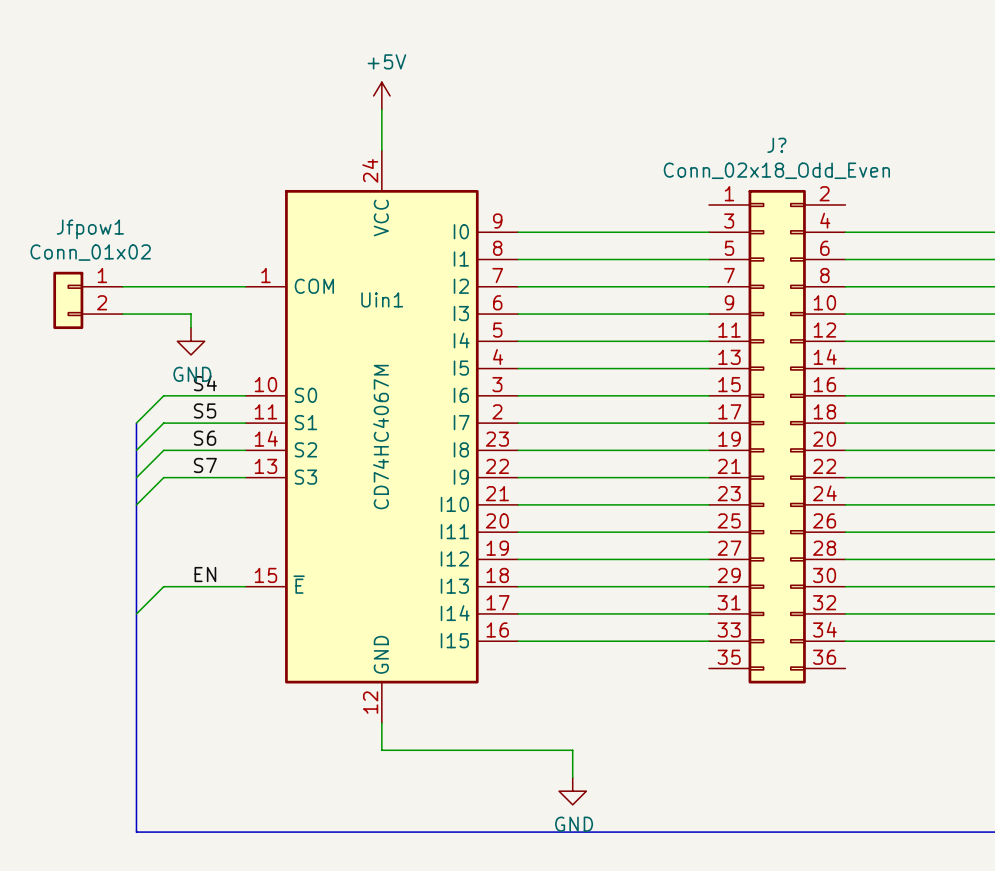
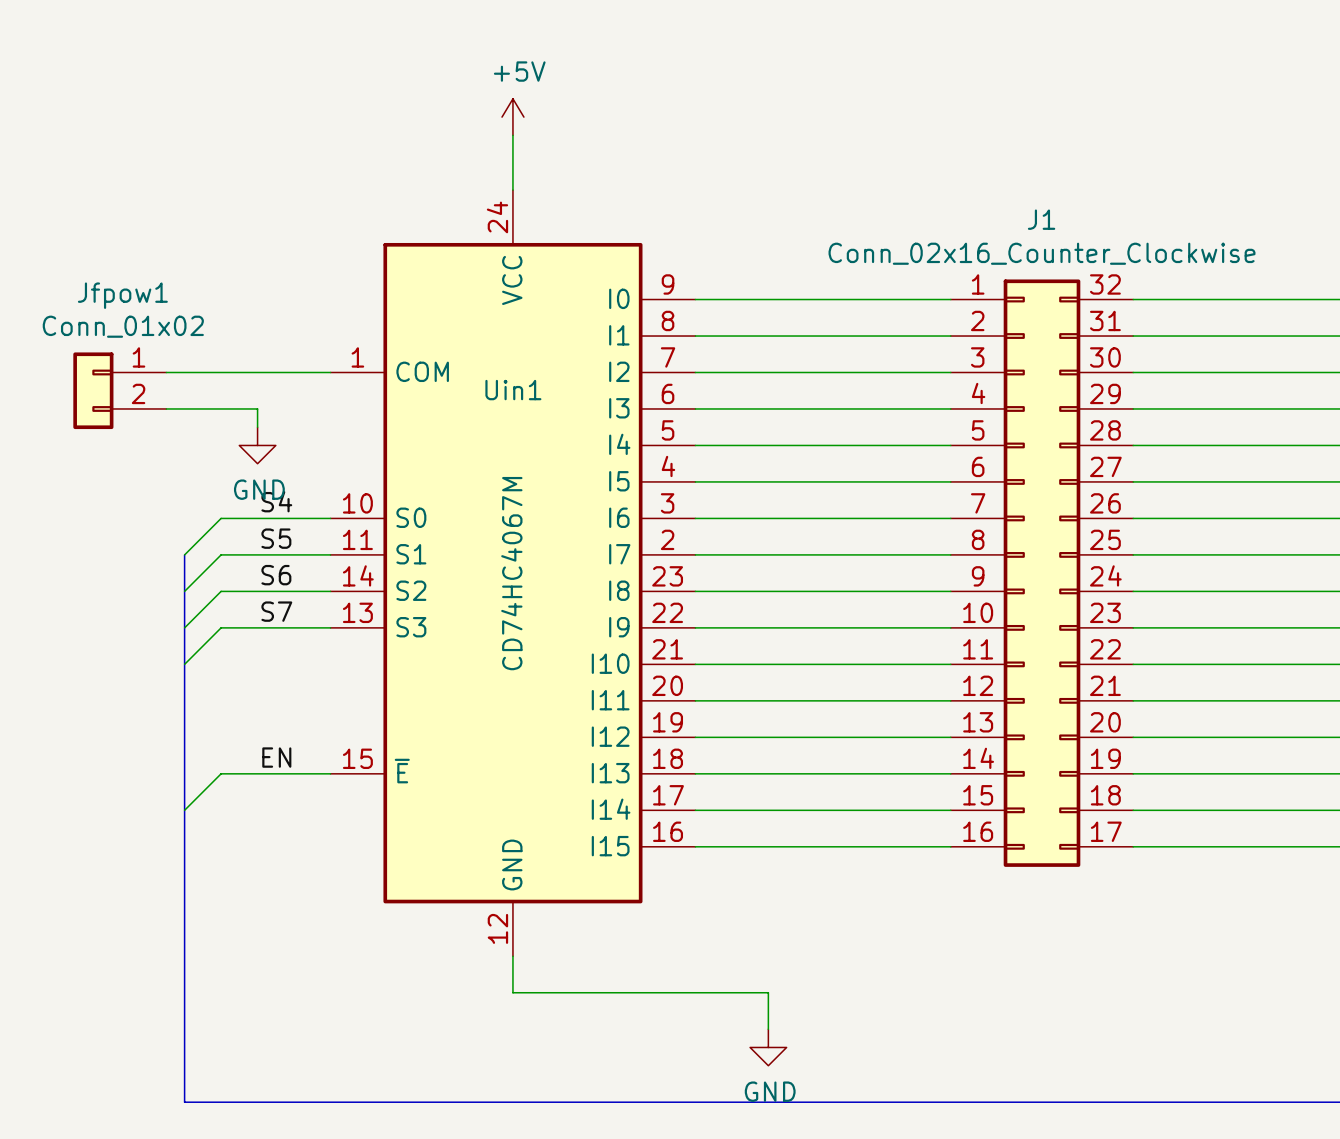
J?: Conn_02x18_Odd_Even (777, 436) -> none
J1: none -> Conn_02x16_Counter_Clockwise (1042, 573)

